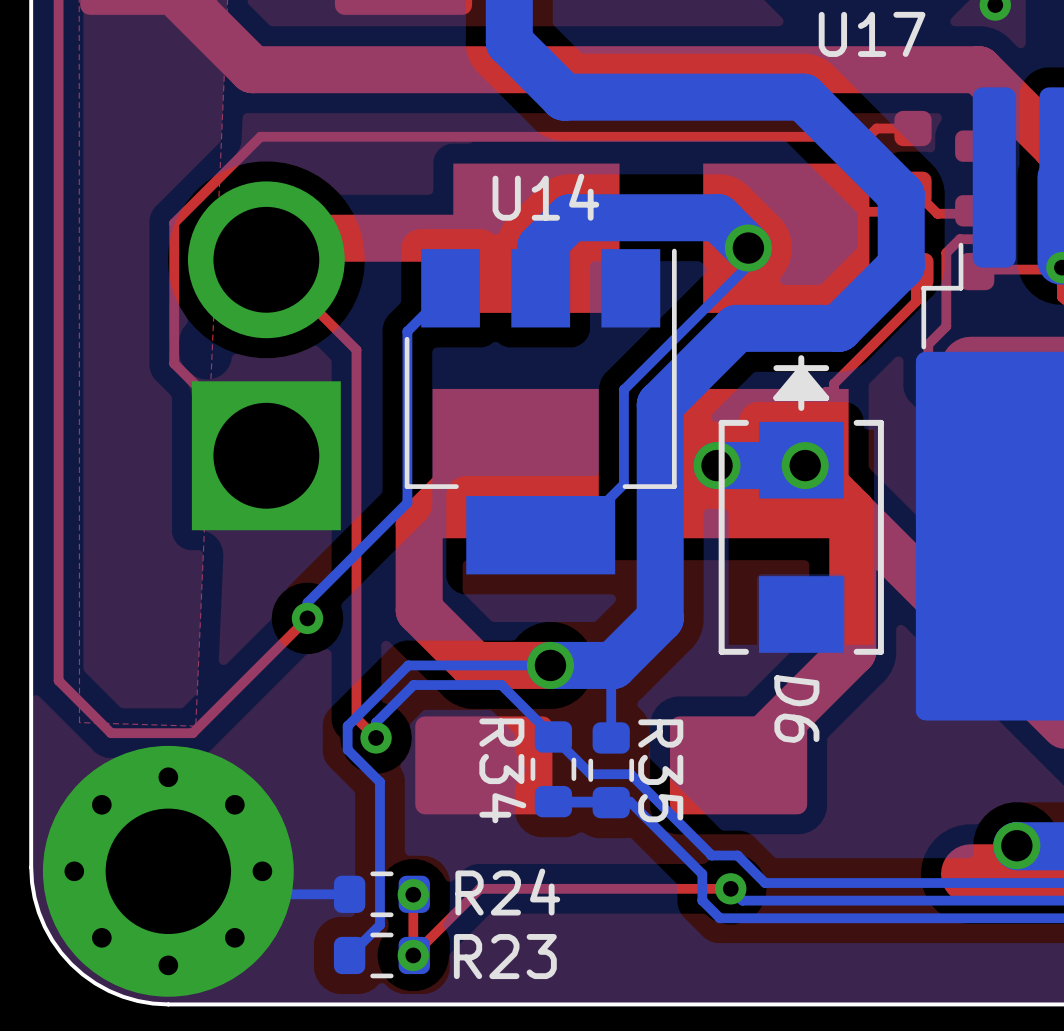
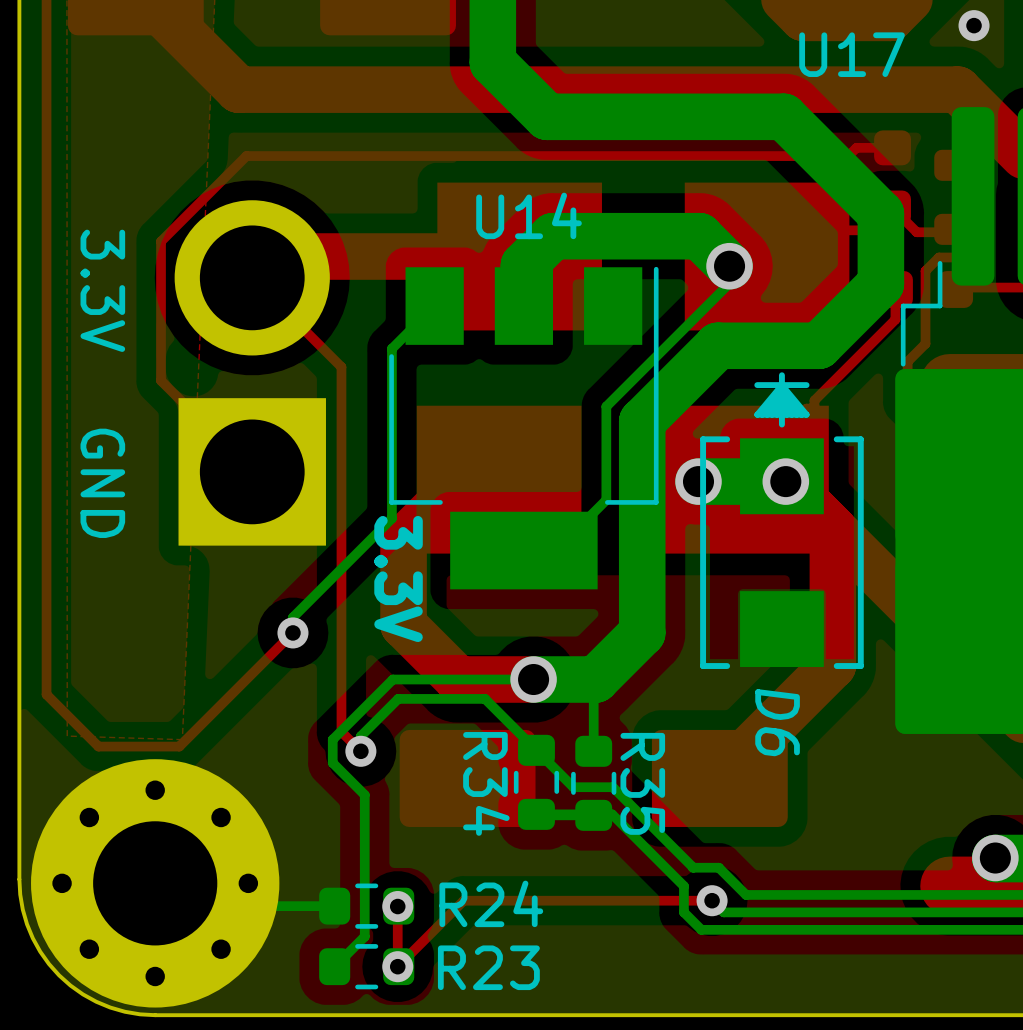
text: none -> 3.3V (102, 290)
text: none -> GND (102, 483)
text: none -> 3.3V (398, 578)

